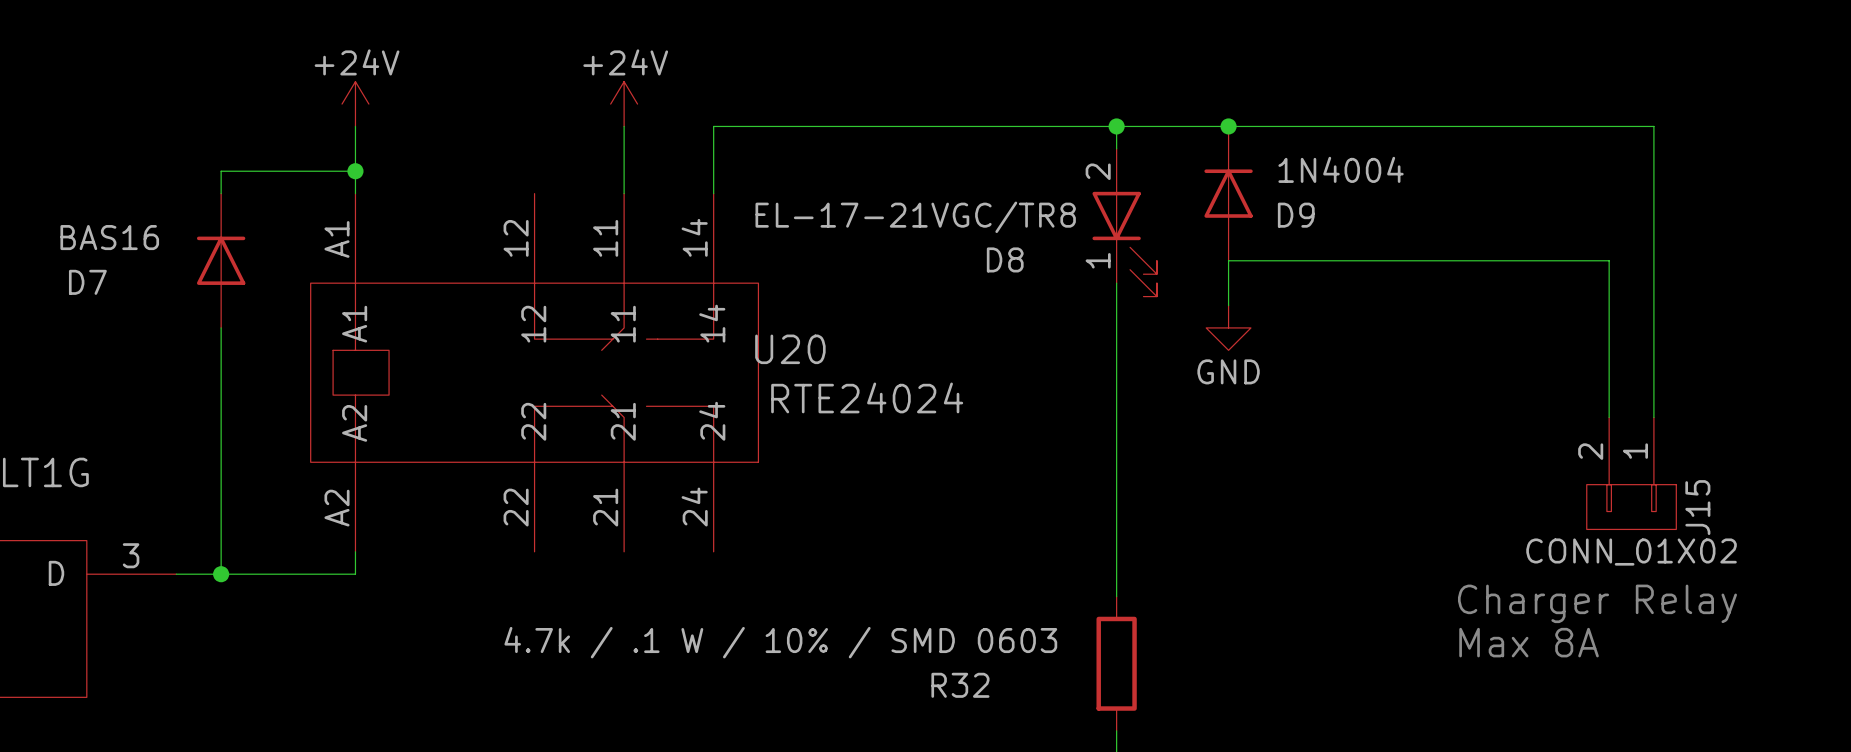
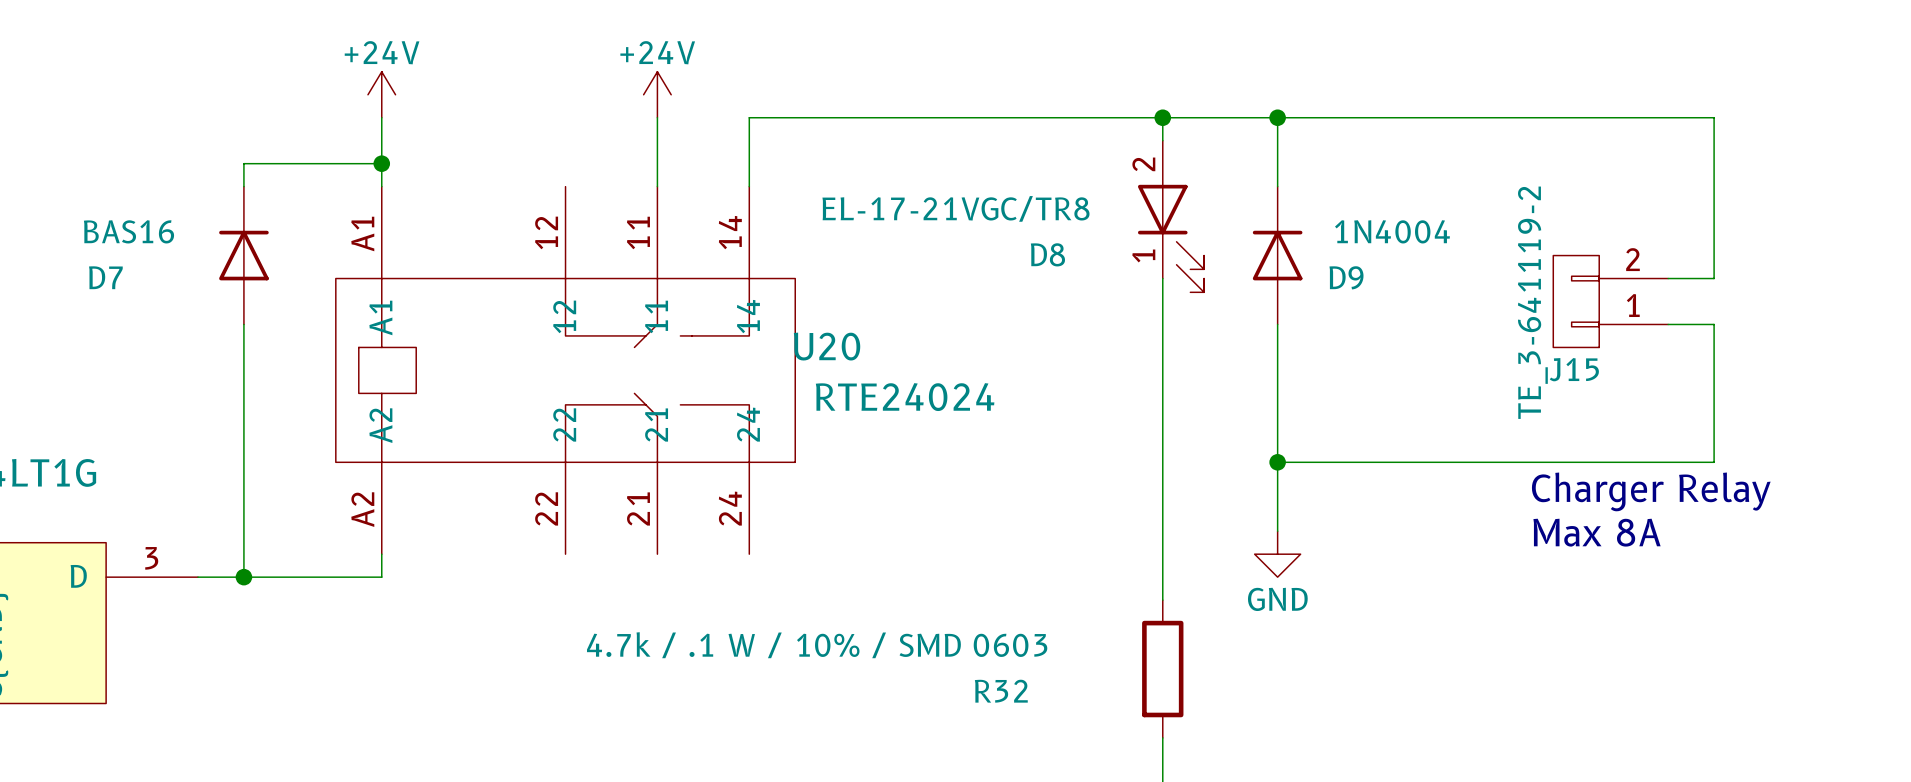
D9 position: (1228, 193) -> (1277, 255)
wire: (1653, 283) (1653, 327) -> (1714, 278) (1668, 278)
wire: (1228, 305) (1228, 260) (1609, 260) (1609, 417) -> none
wire: none -> (1277, 324) (1277, 531)
power symbol position: GND (1228, 327) -> GND (1277, 554)
wire: none -> (1668, 324) (1714, 324)
wire: none -> (1714, 416) (1714, 462) (1277, 462)
junction: none -> (1277, 462)
J15 position: (1631, 473) -> (1610, 301)
J15 rotation: 0° (1631, 507) -> 90° clockwise (1576, 301)
J15 value: CONN_01X02 (1631, 552) -> TE_3-641119-2 (1532, 302)
text position: Charger Relay (1597, 603) -> Charger Relay (1651, 491)
text position: Max 8A (1529, 642) -> Max 8A (1597, 532)

